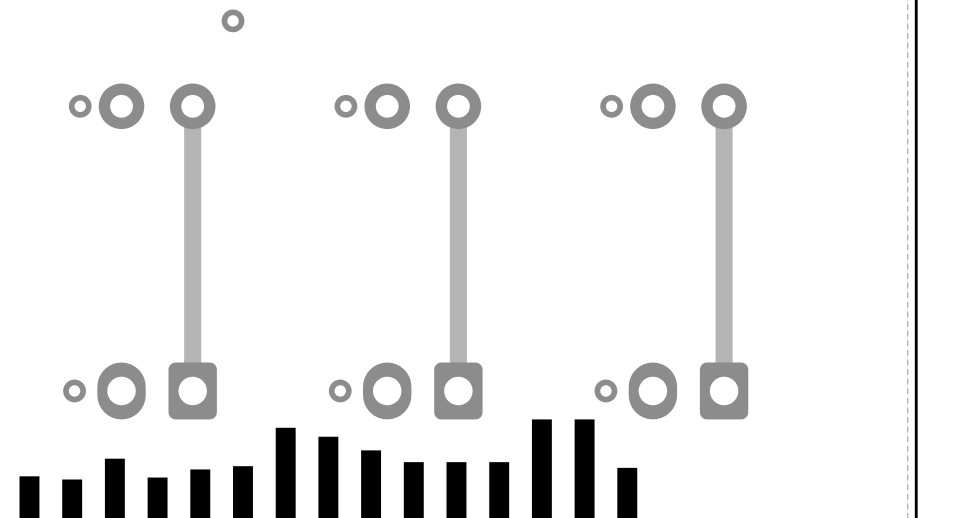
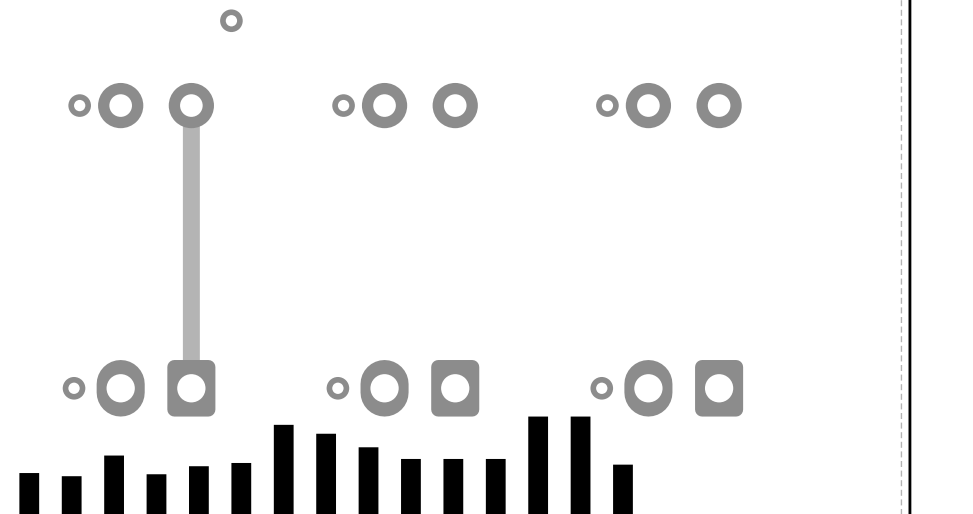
track: (458, 106) (458, 390) -> none
track: (724, 106) (724, 390) -> none

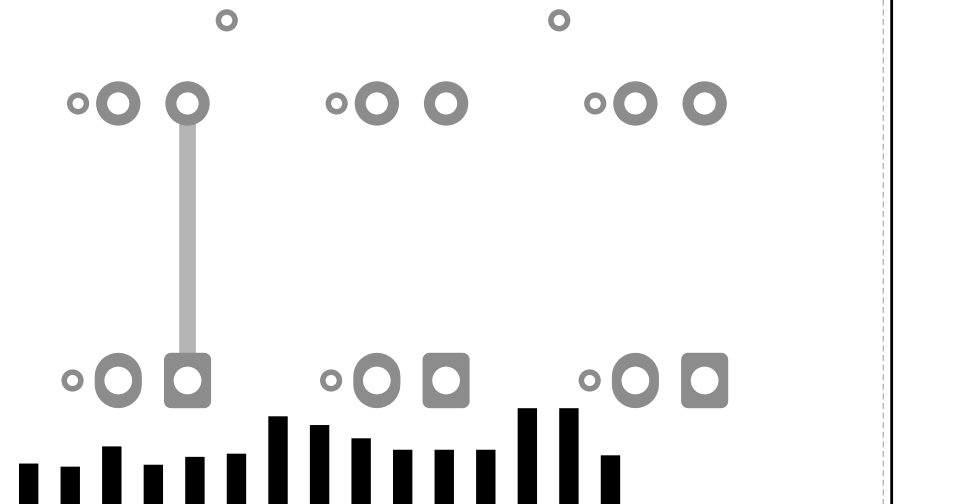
via: none -> (559, 20)

